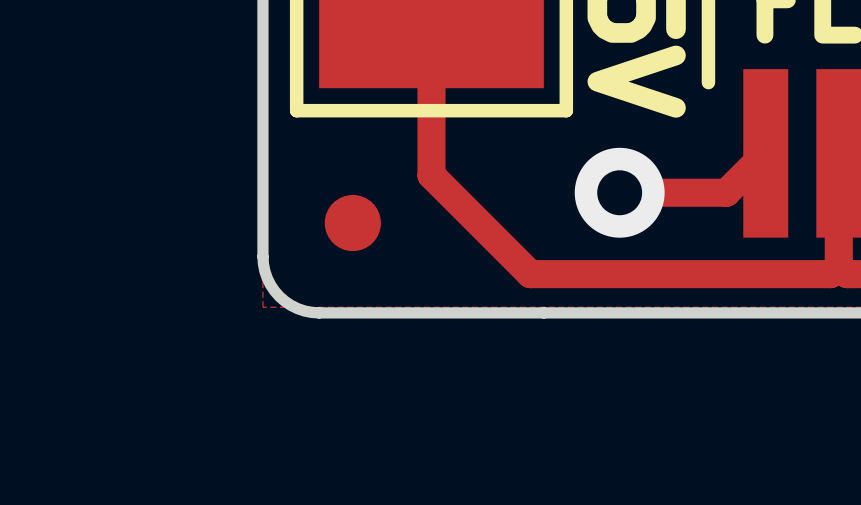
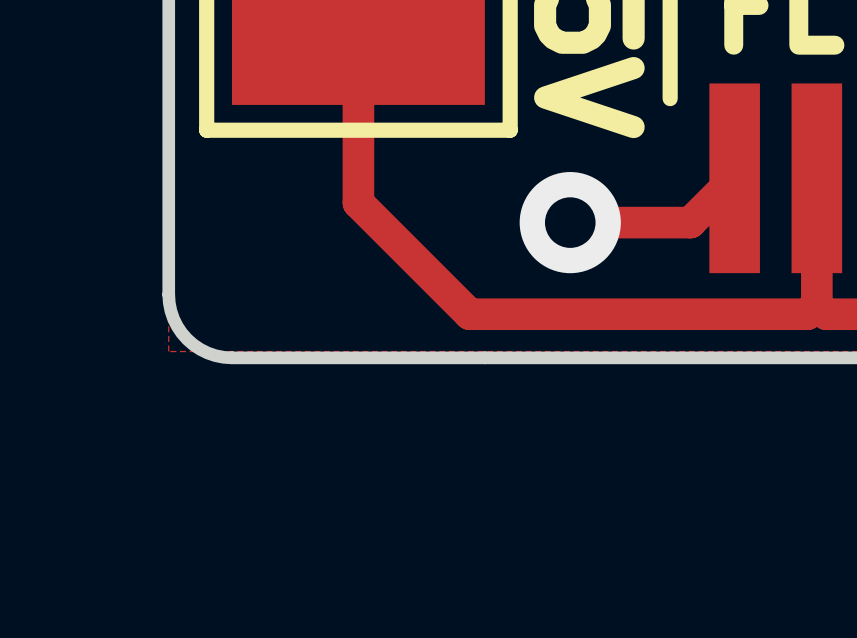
part: (352, 223) -> none

